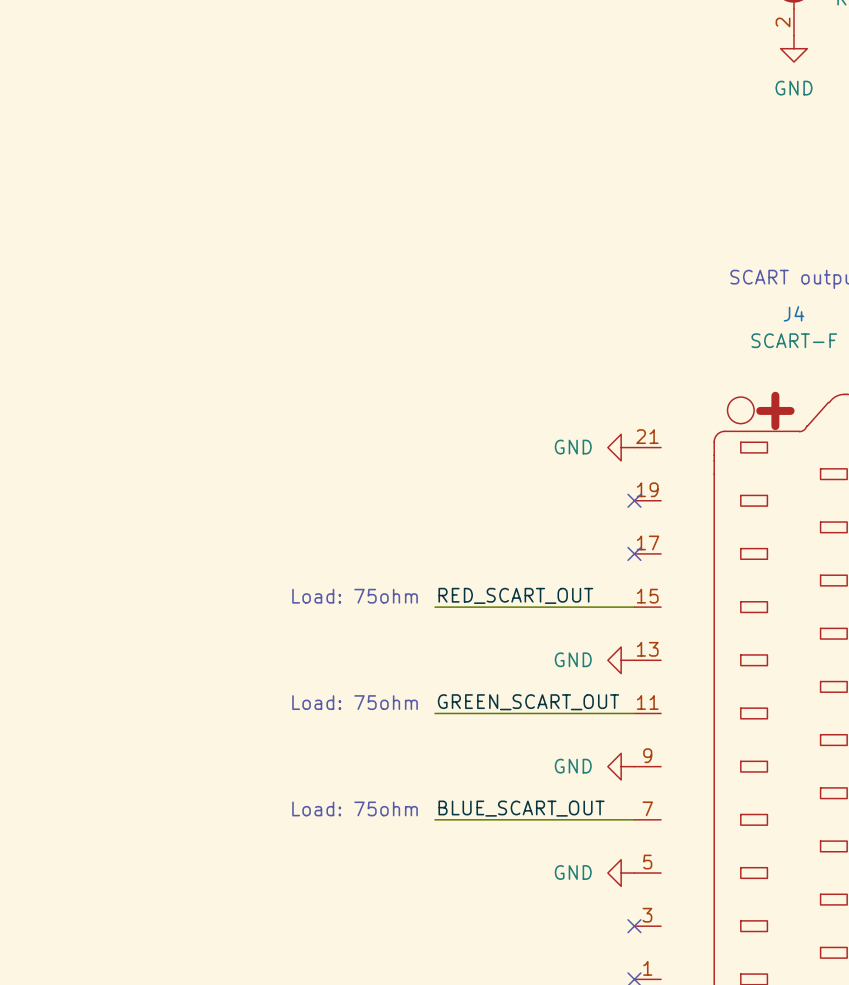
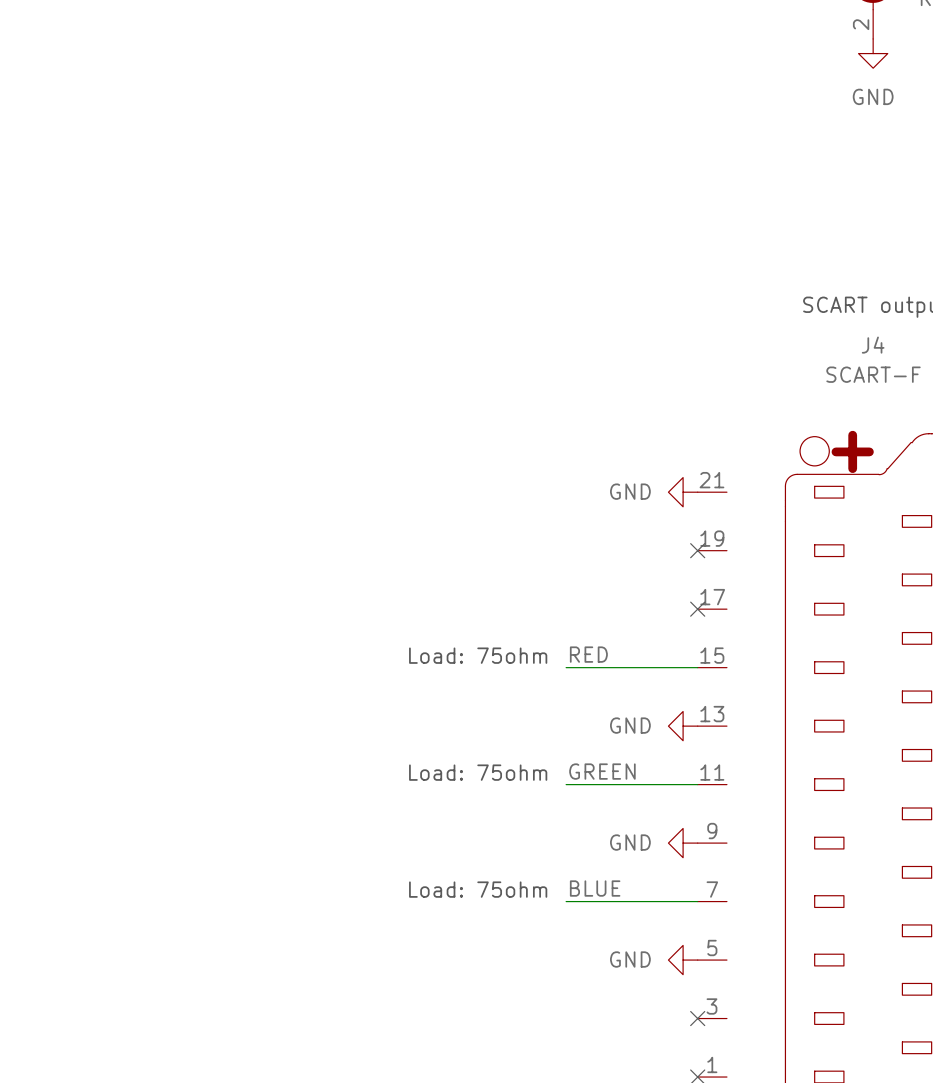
label: RED_SCART_OUT (515, 595) -> none
label: none -> RED (588, 654)
text position: Load: 75ohm (355, 596) -> Load: 75ohm (478, 655)
wire: (435, 607) (514, 607) -> none
label: none -> GREEN (602, 771)
text position: Load: 75ohm (355, 702) -> Load: 75ohm (478, 772)
label: GREEN_SCART_OUT (528, 702) -> none
wire: (435, 713) (514, 713) -> none
label: none -> BLUE (595, 888)
text position: Load: 75ohm (355, 808) -> Load: 75ohm (478, 889)
label: BLUE_SCART_OUT (521, 808) -> none
wire: (435, 819) (514, 819) -> none

